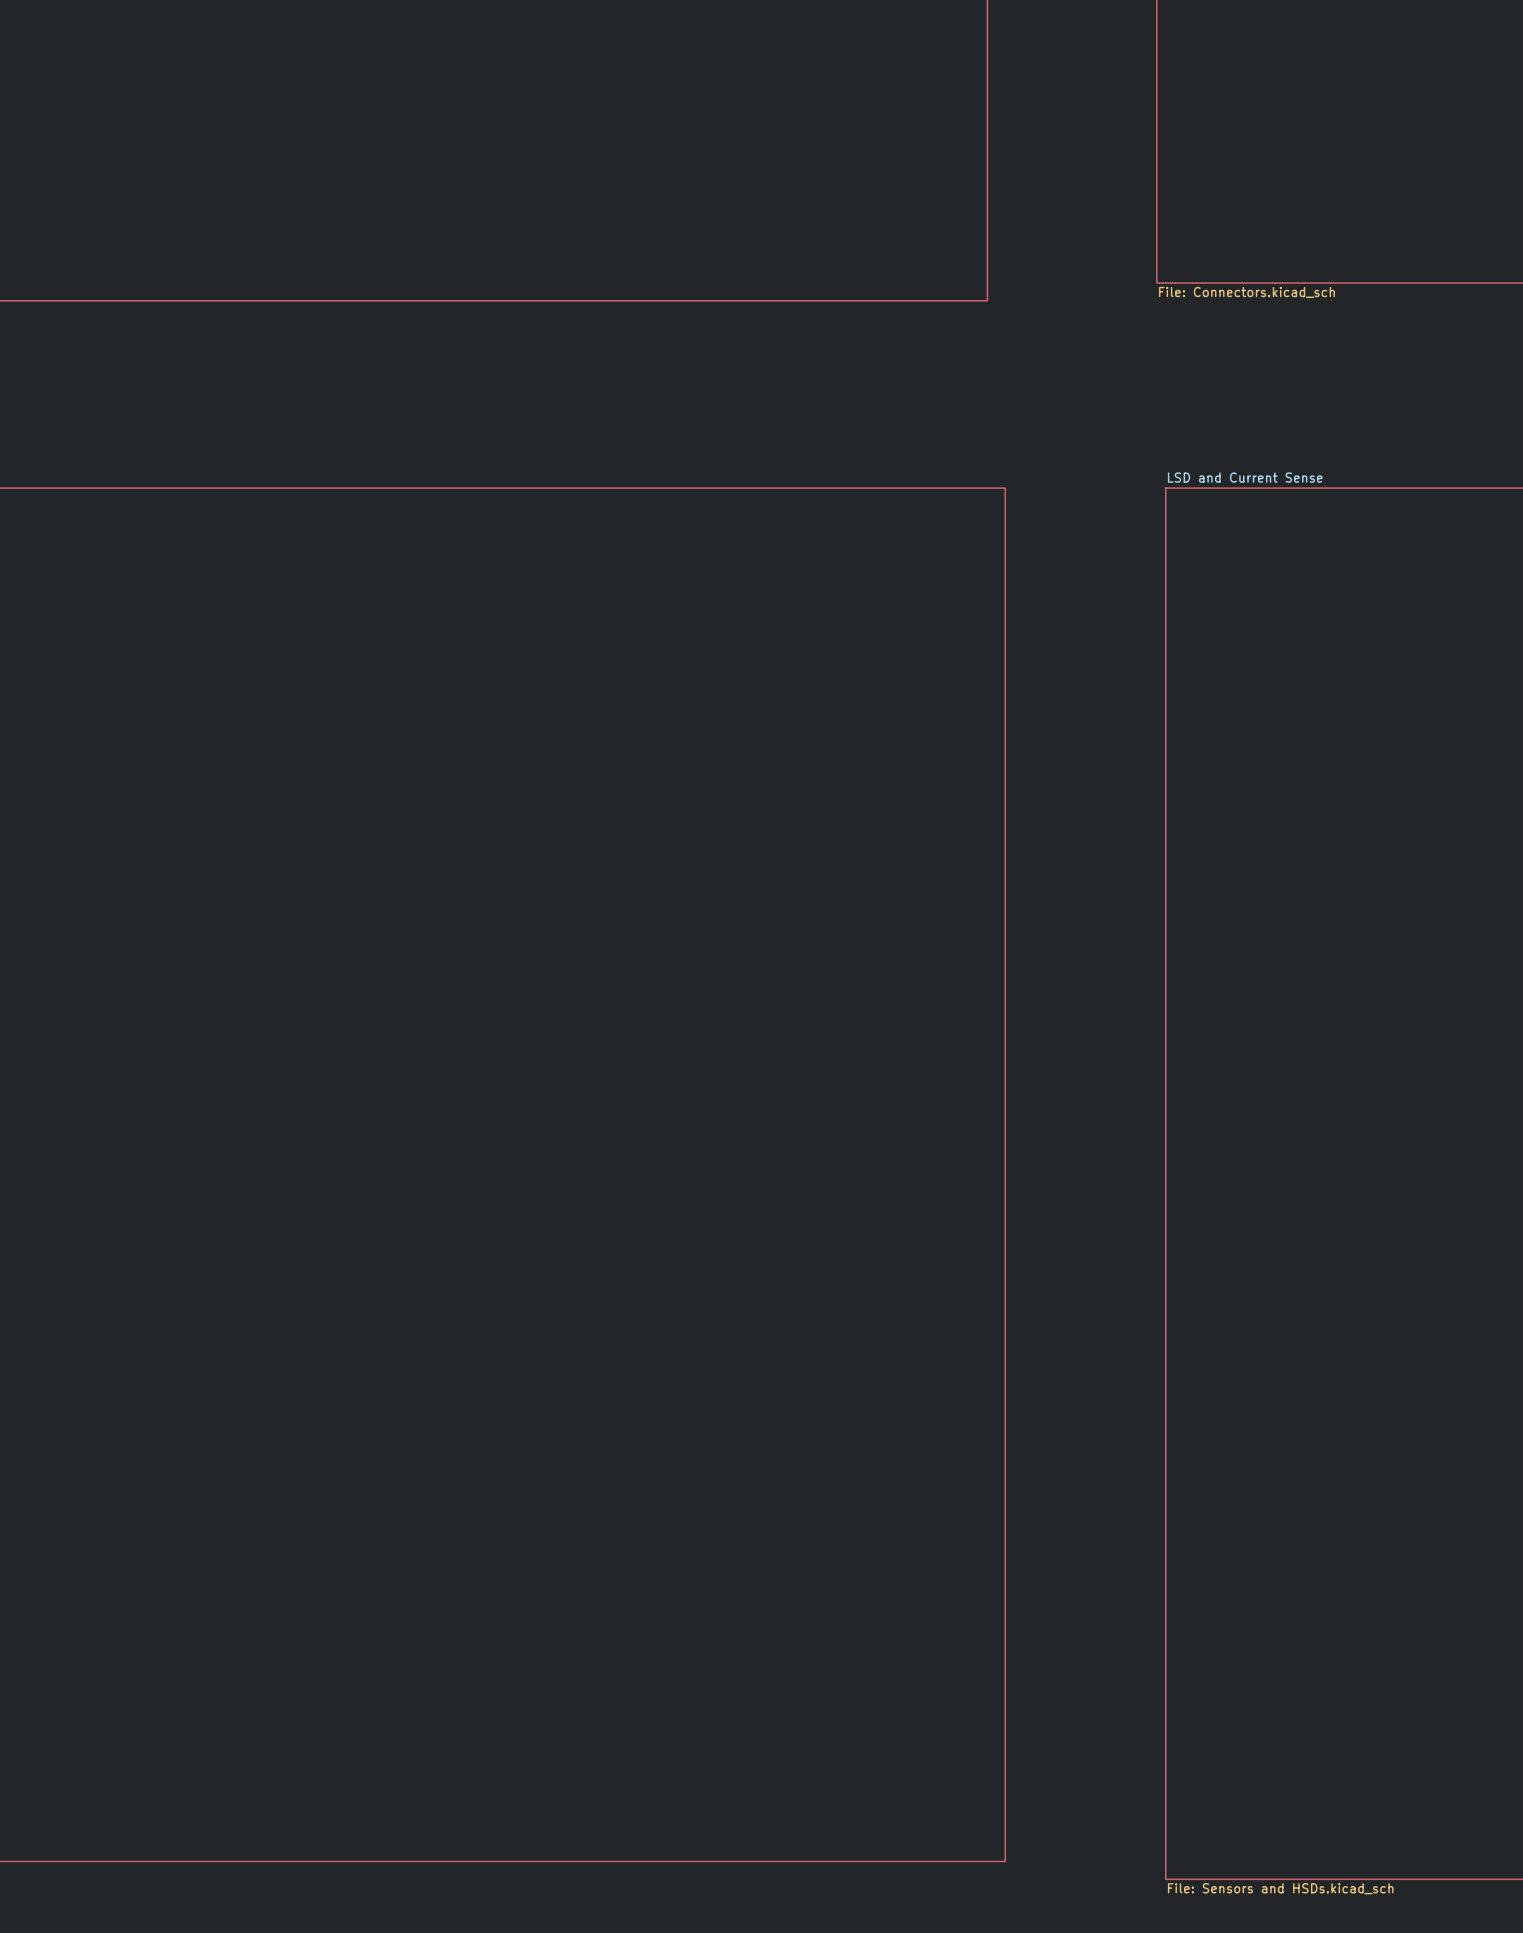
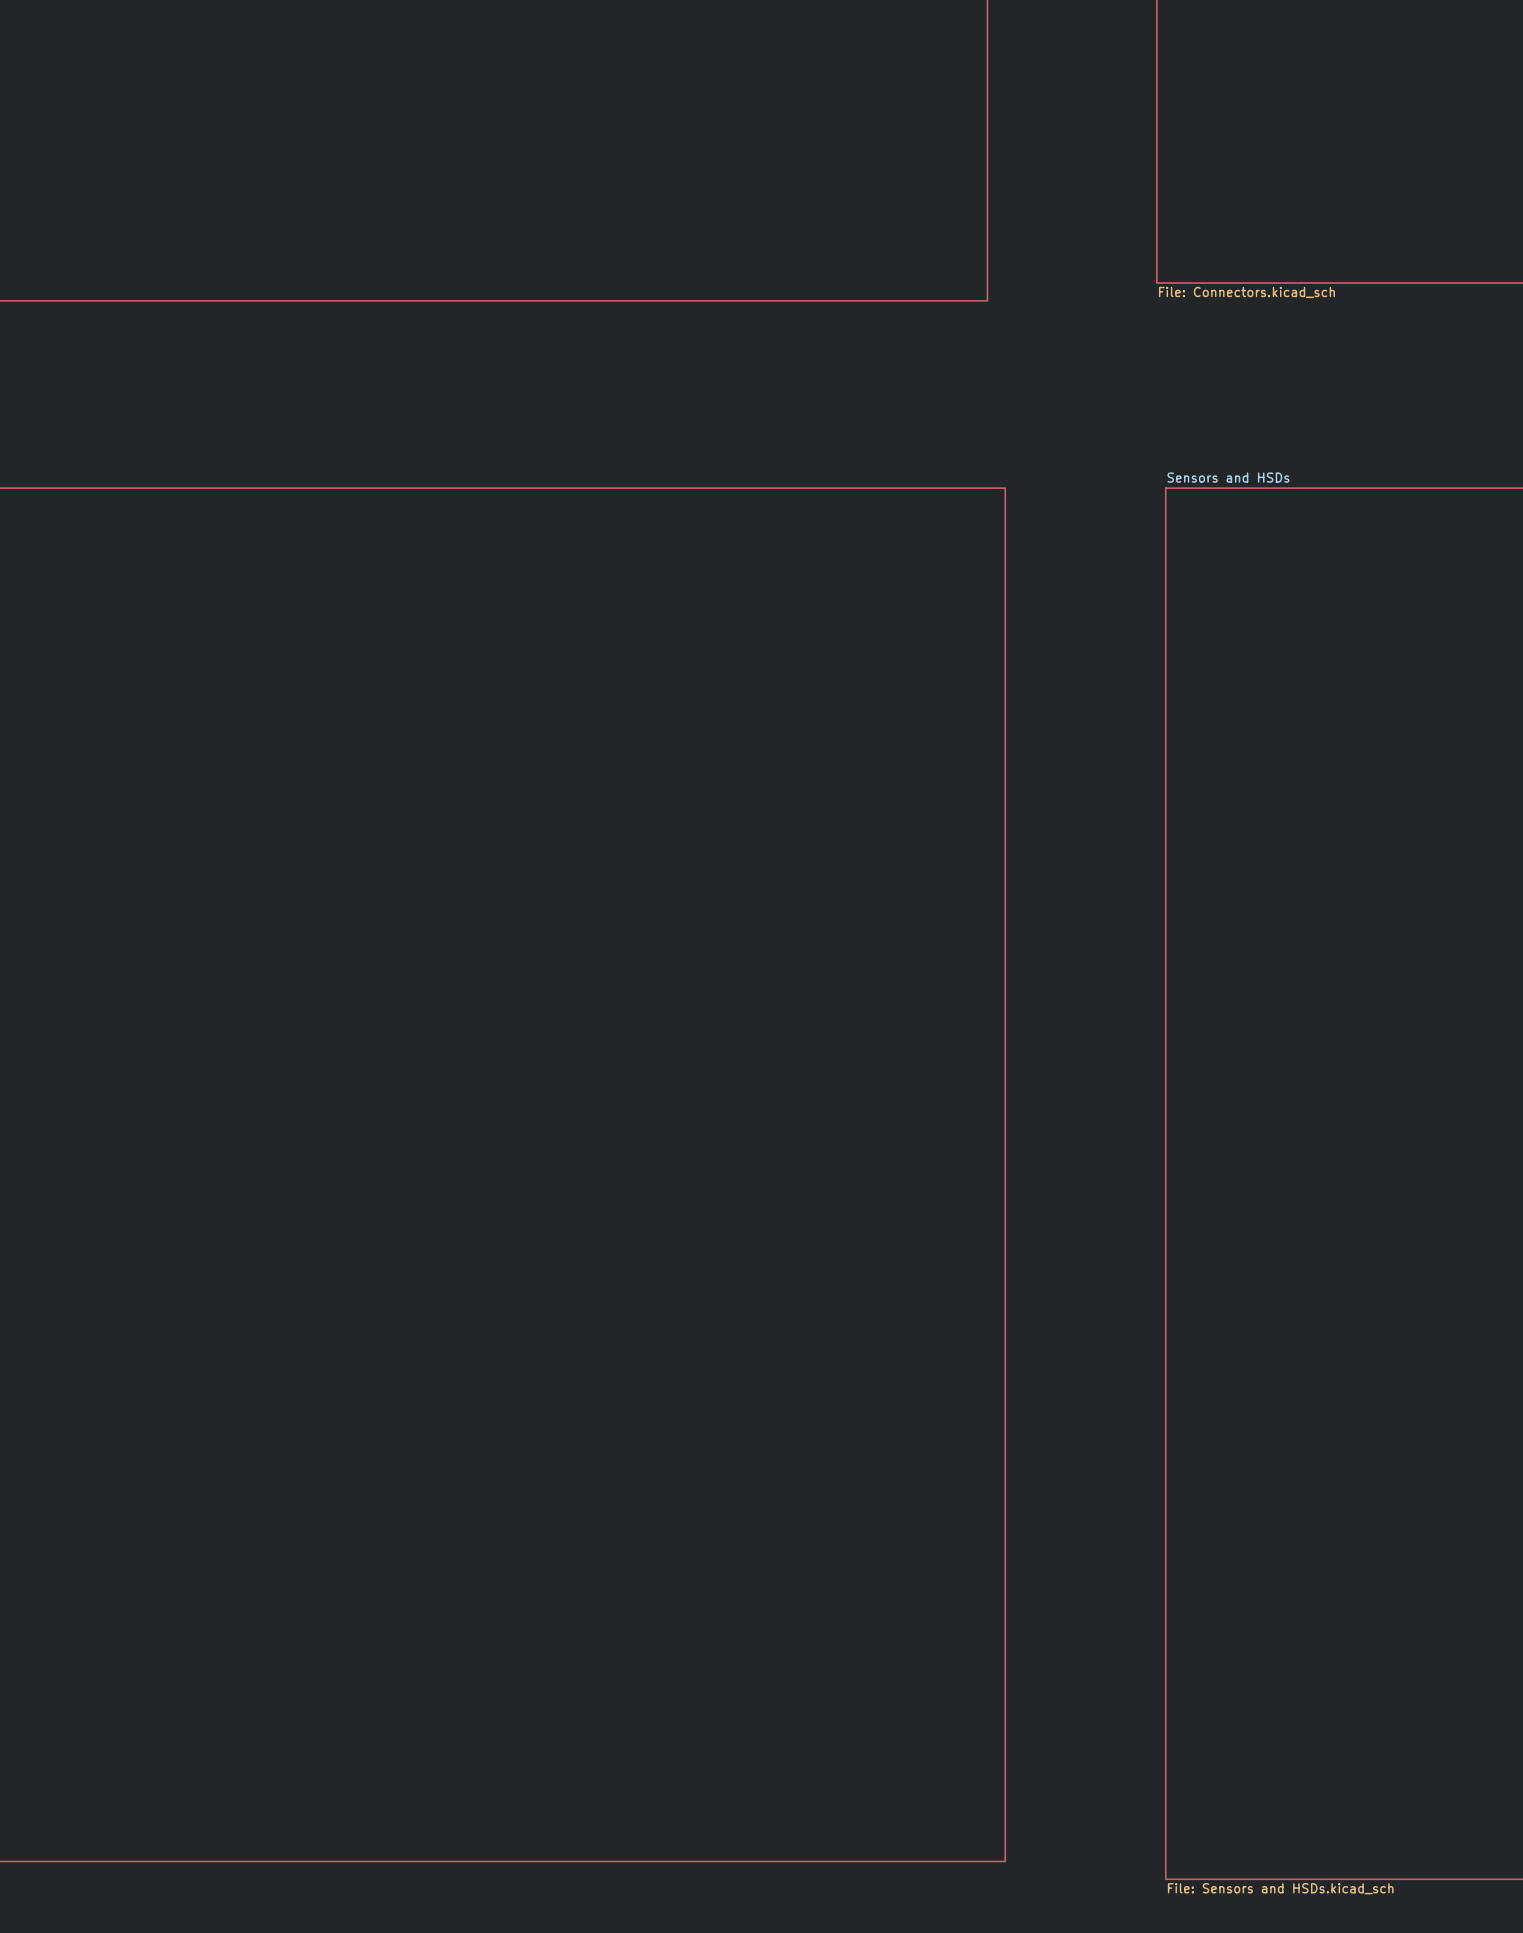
sheet LSD and Current Sense name: LSD and Current Sense (1245, 477) -> Sensors and HSDs (1228, 477)

